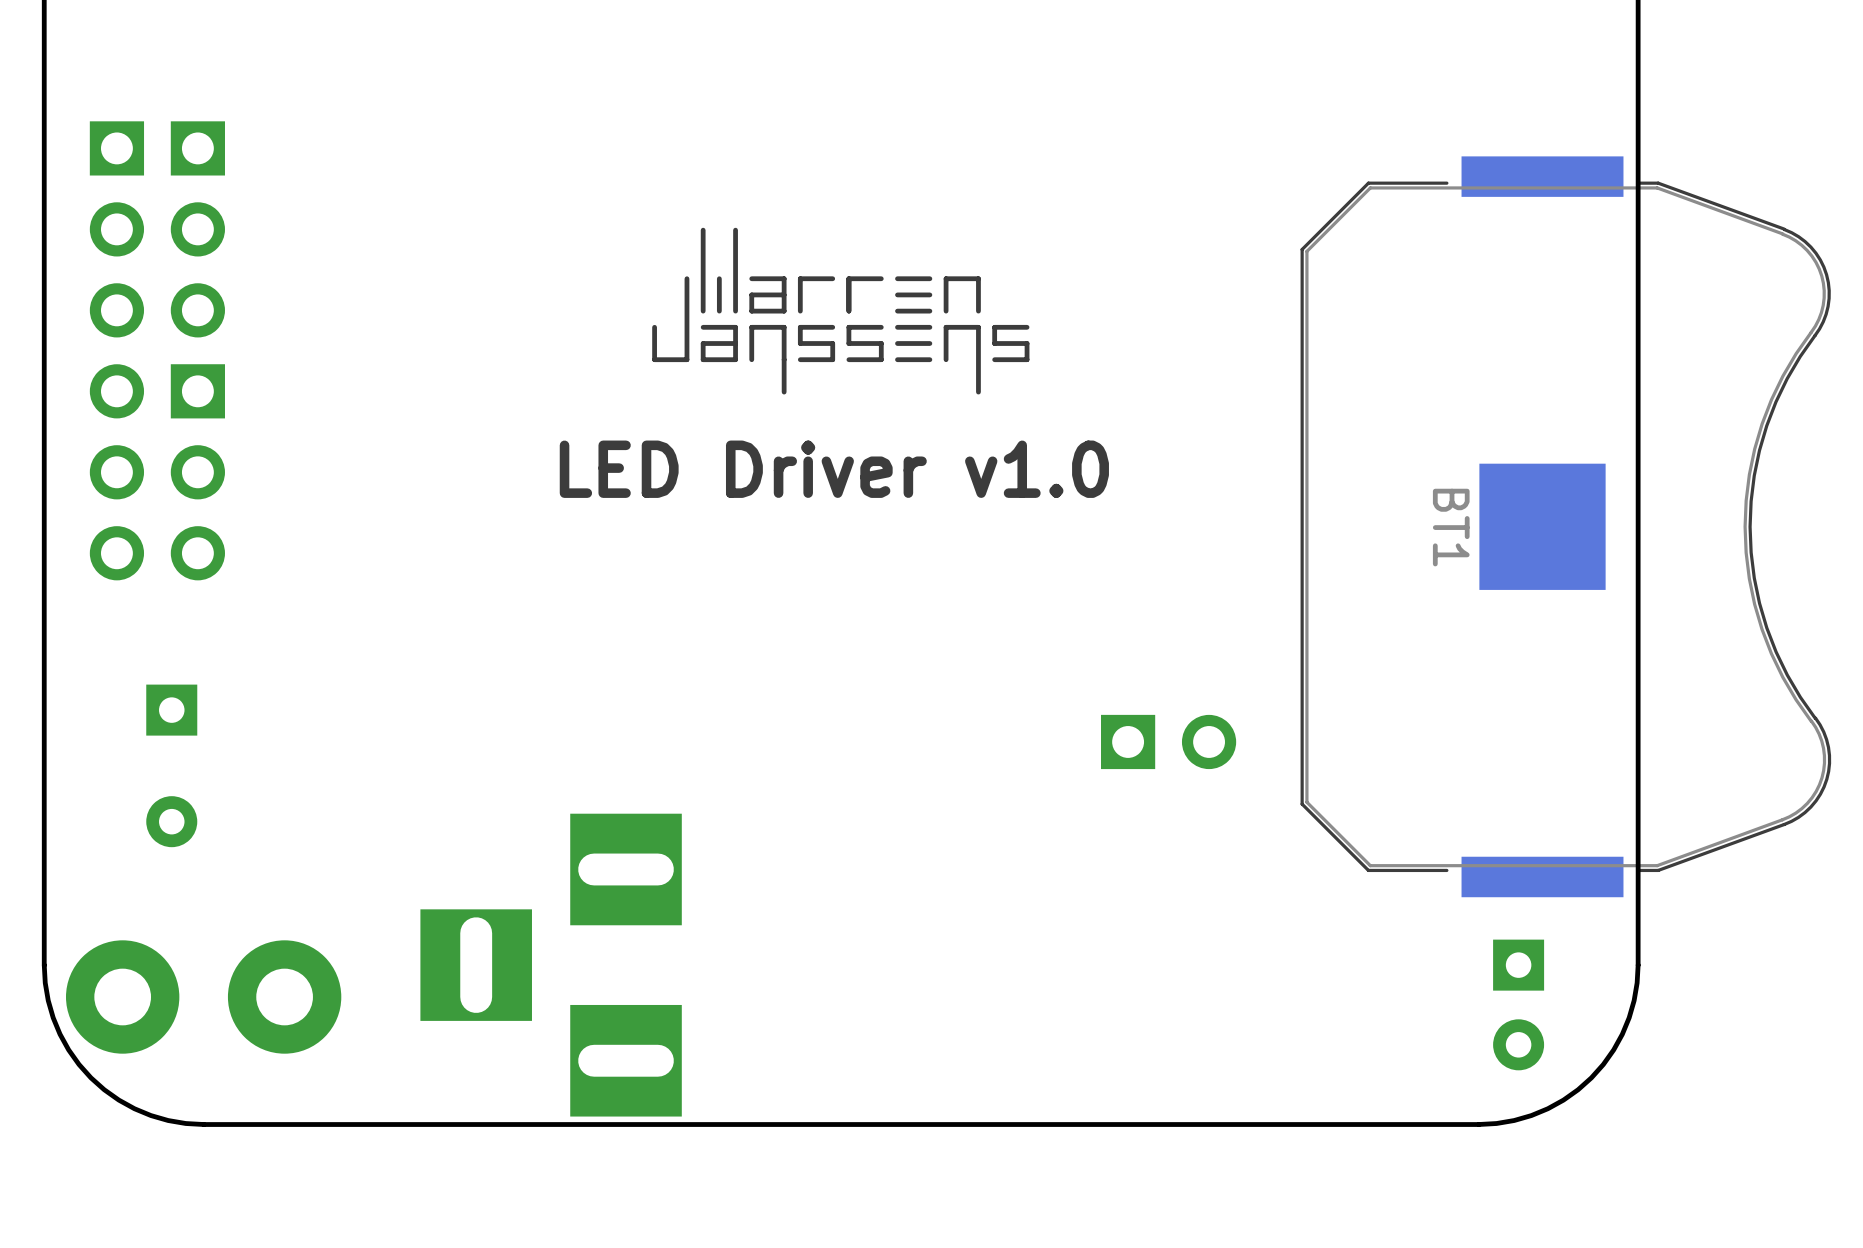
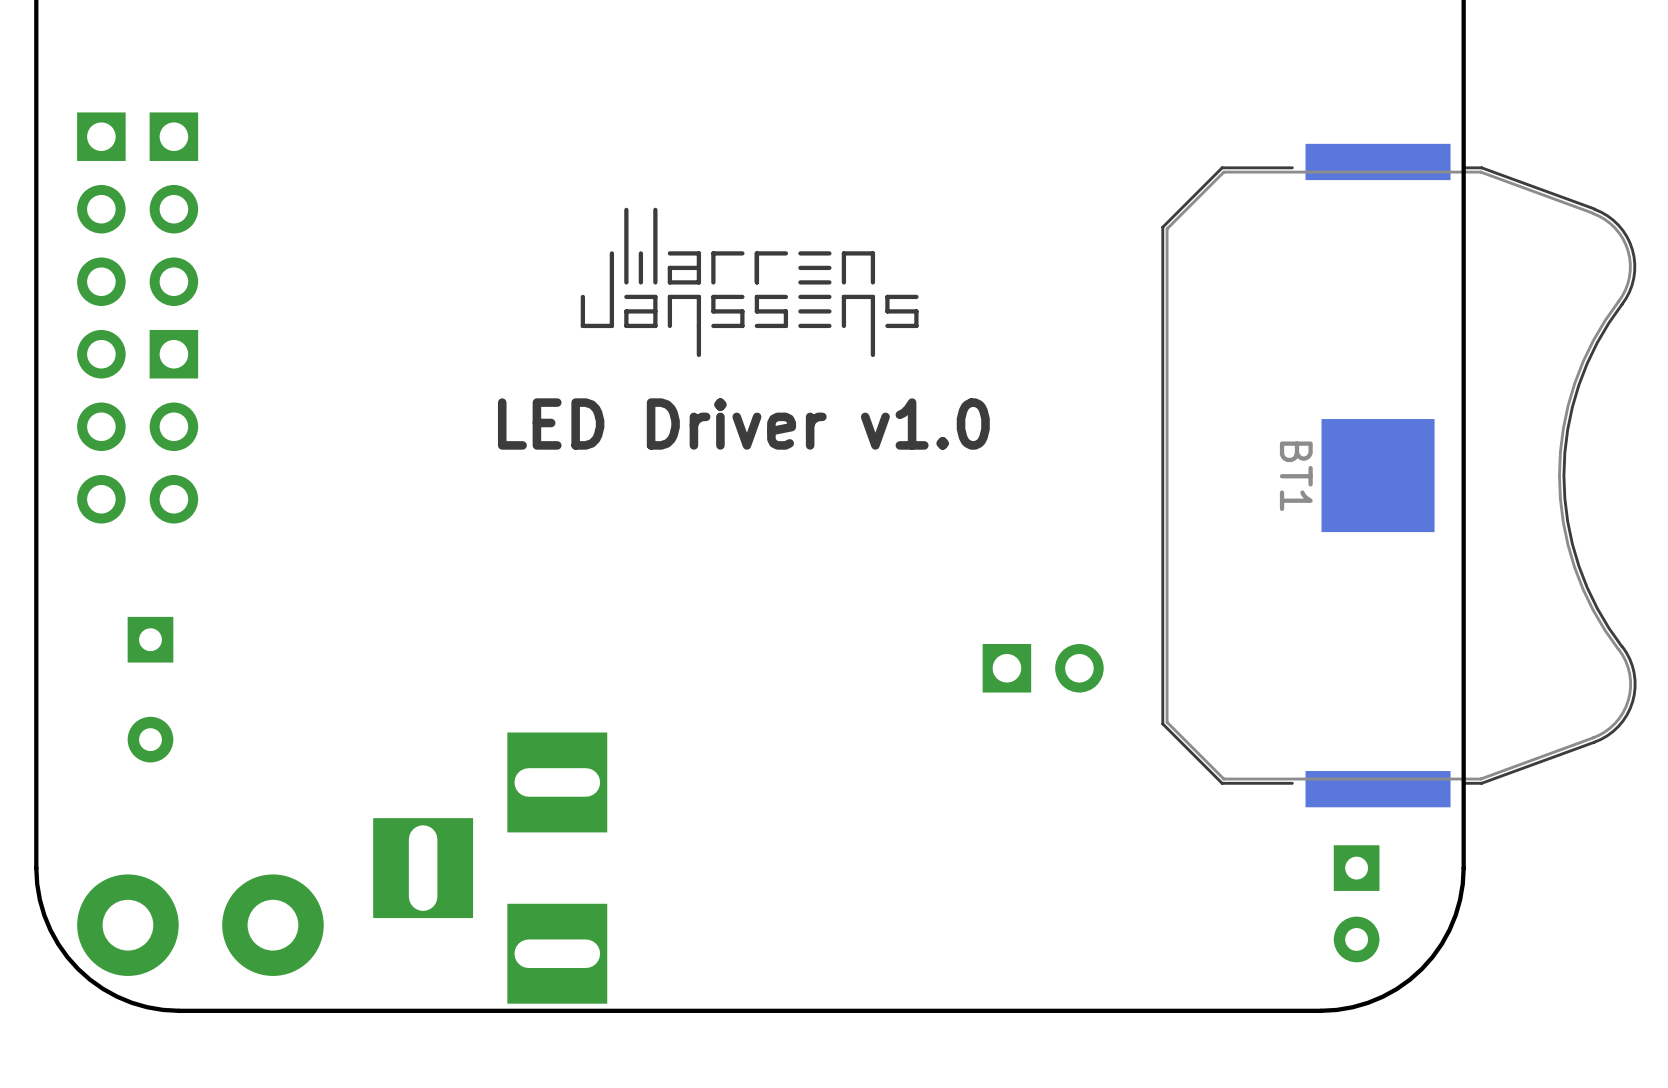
part position: (203, 997) -> (200, 925)

